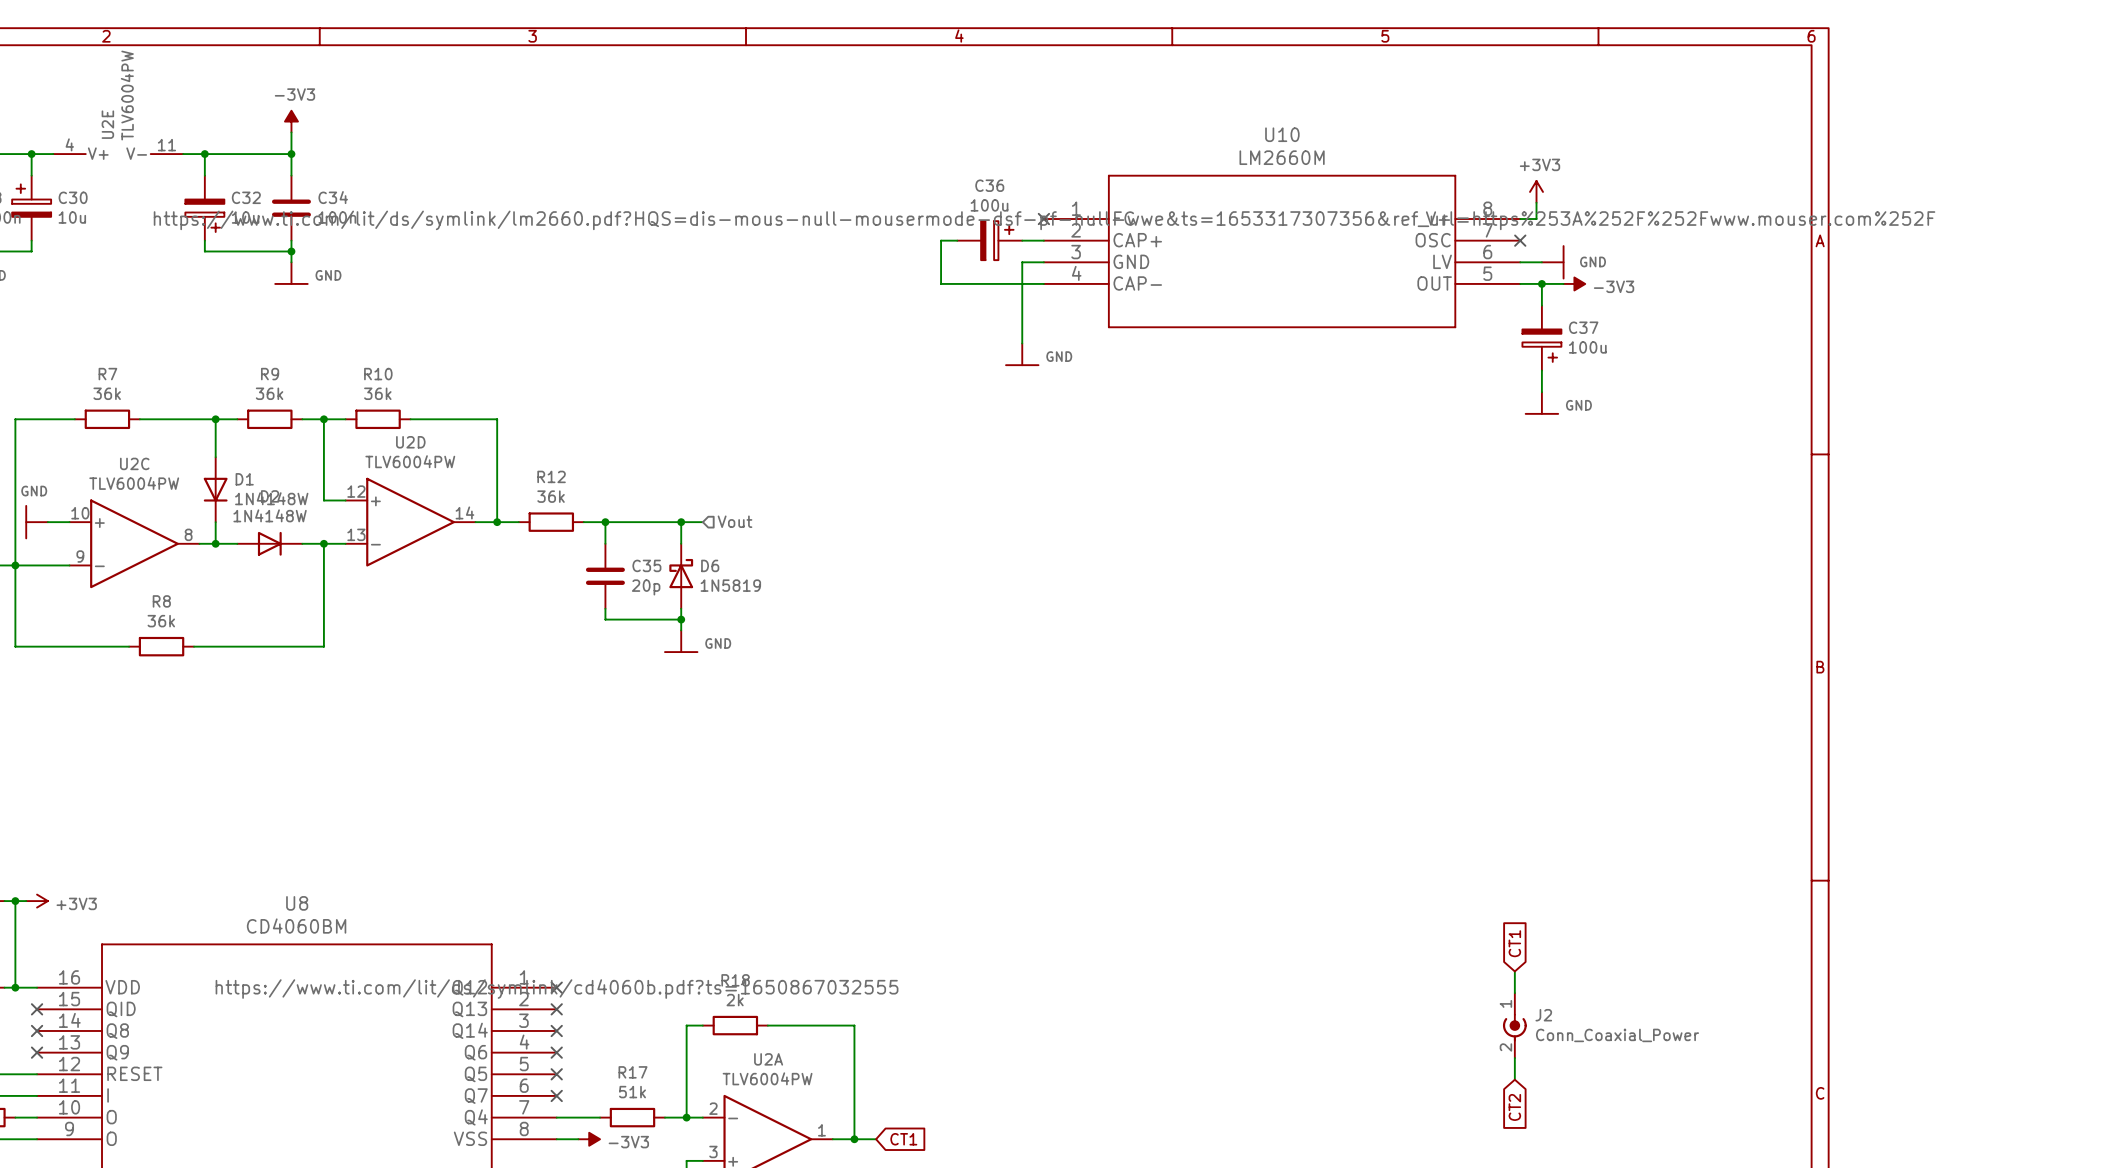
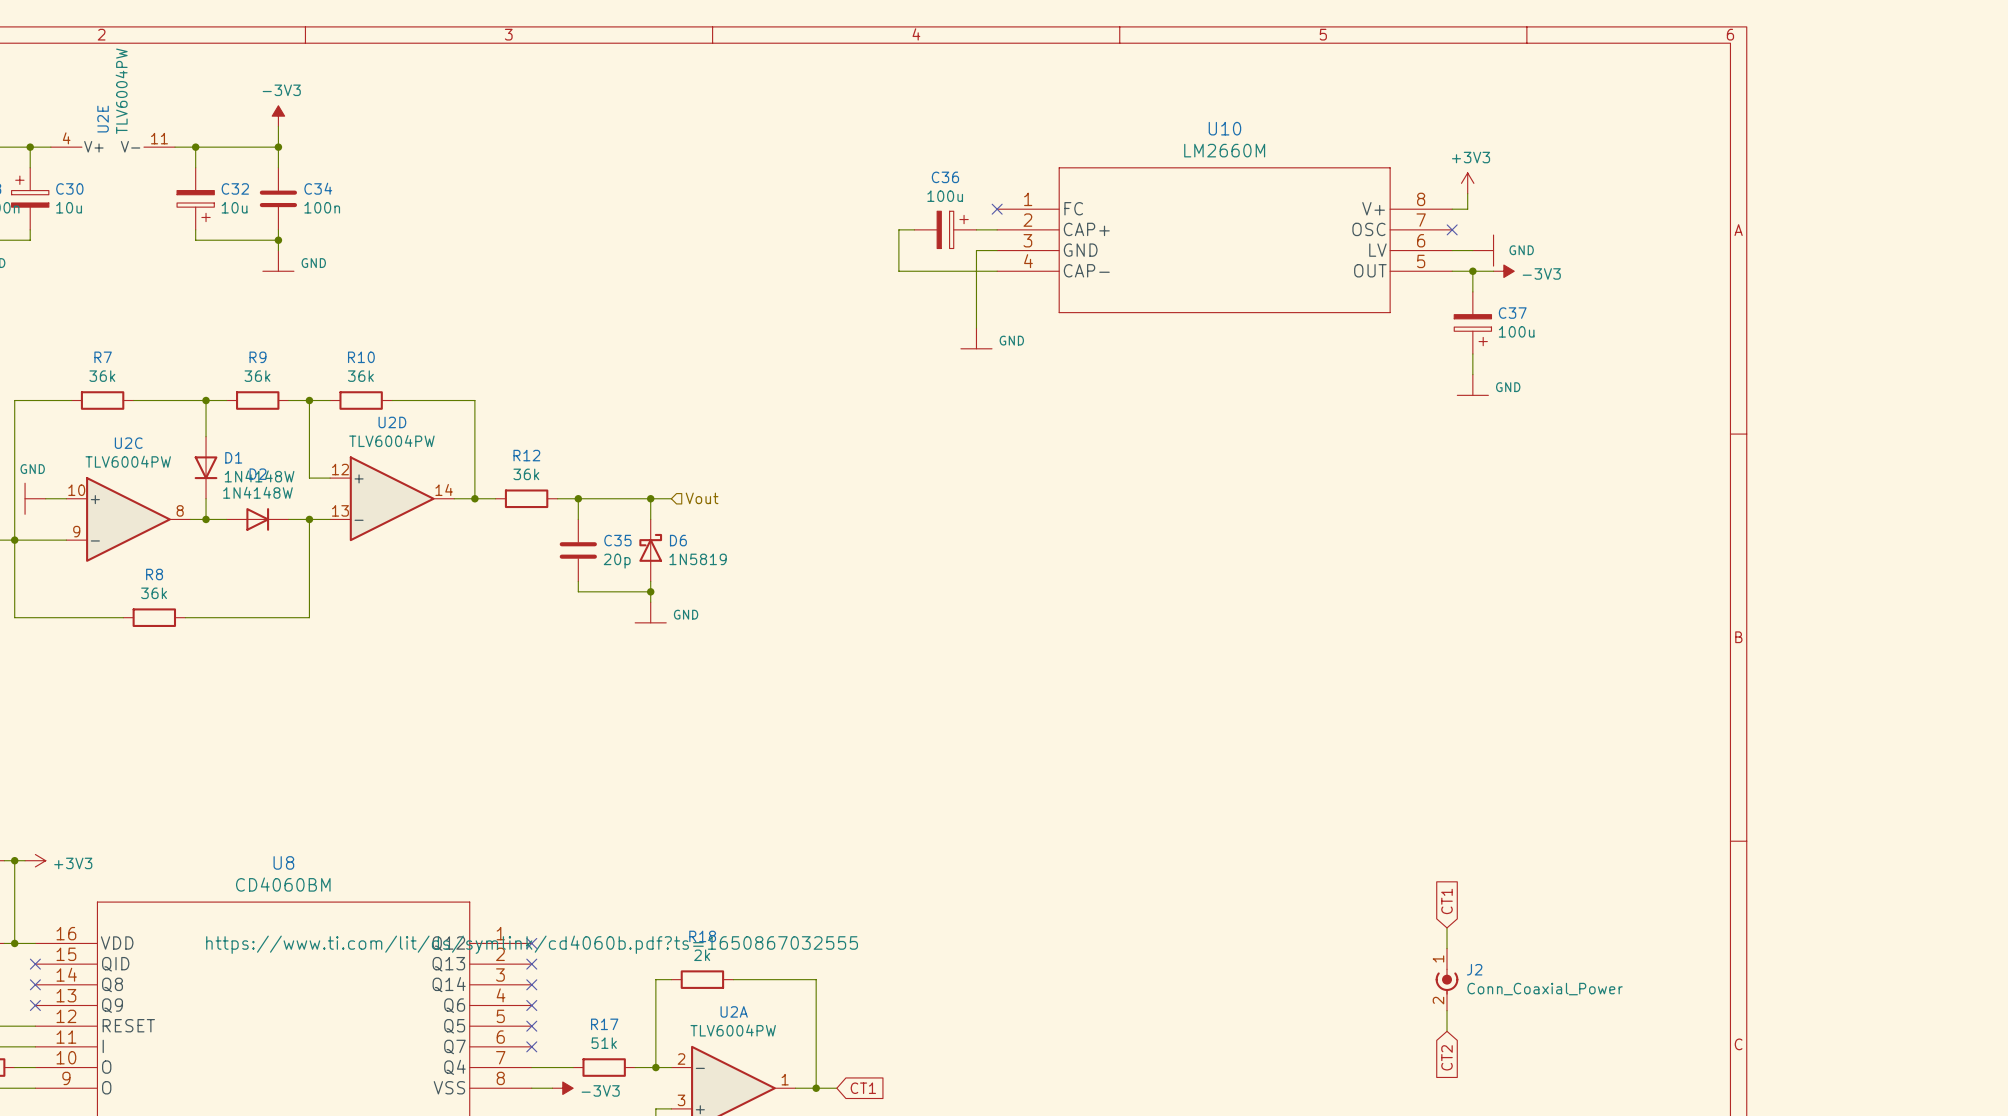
U10 text: https://www.ti.com/lit/ds/symlink/lm2660.pdf?HQS=dis-mous-null-mousermode-dsf-pf-null-wwe&ts=1653317307356&ref_url=https%253A%252F%252Fwww.mouser.com%252F (1044, 220) -> none

